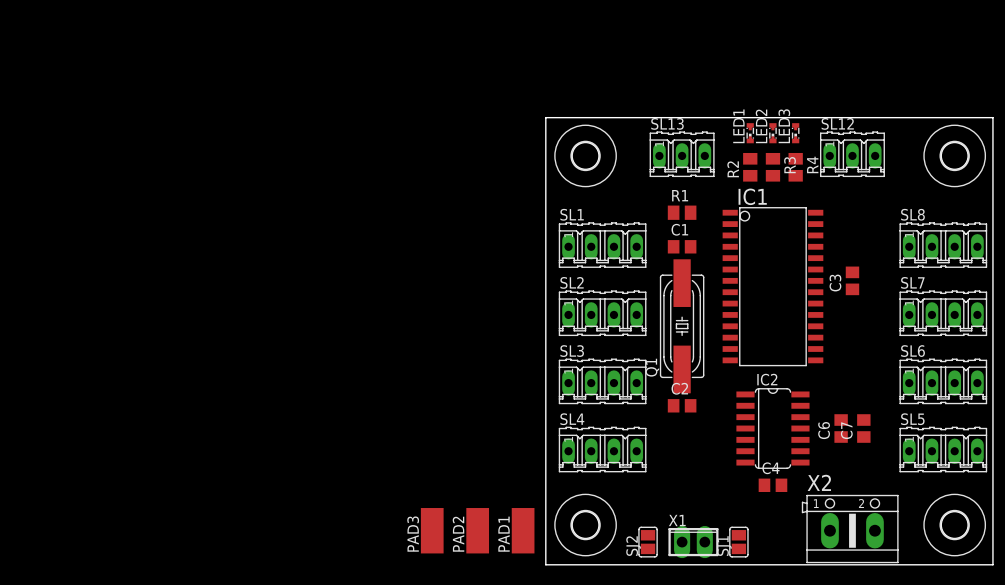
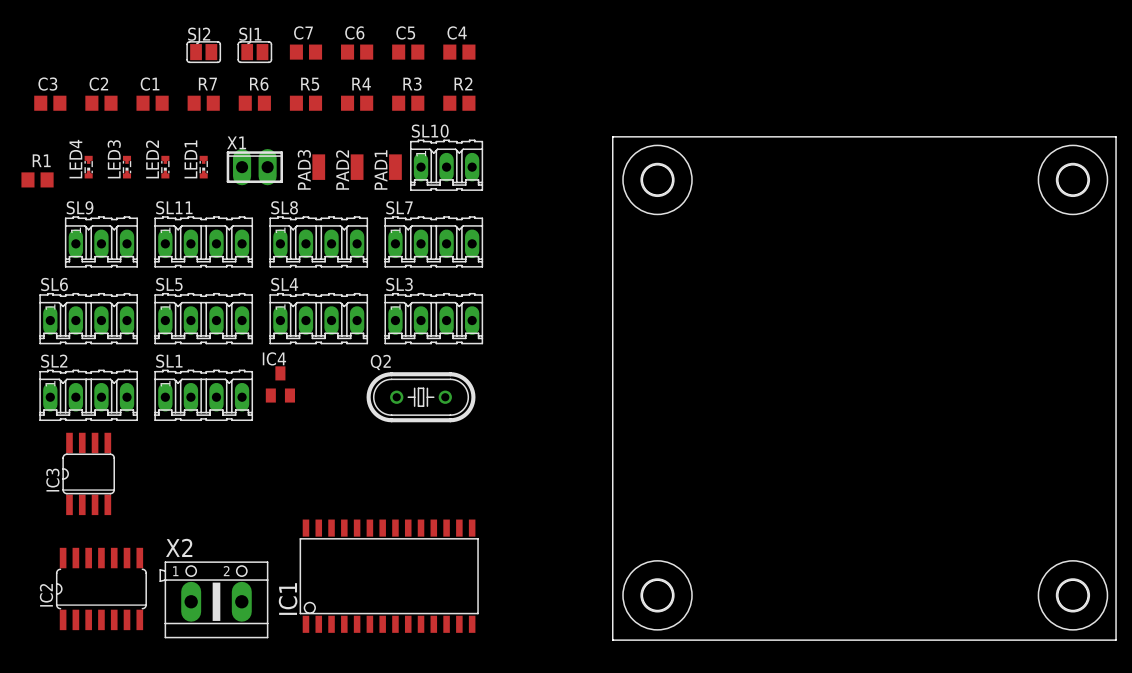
C5: none -> (408, 52)
R7: none -> (203, 103)
R6: none -> (254, 103)
R5: none -> (305, 103)
LED1 position: (750, 133) -> (203, 167)
LED2 position: (772, 133) -> (165, 167)
LED3 position: (795, 133) -> (127, 167)
SL10: none -> (446, 165)
LED4: none -> (88, 167)
R2 footprint: [743, 152, 758, 182] -> [443, 95, 476, 111]
R3 footprint: [765, 152, 781, 182] -> [392, 95, 425, 111]
R4 footprint: [788, 152, 803, 182] -> [341, 95, 374, 111]
SL13: (682, 154) -> none
SL12: (852, 154) -> none
R4 name position: R4 (812, 164) -> R4 (361, 84)
R3 name position: R3 (790, 165) -> R3 (412, 84)
R2 name position: R2 (733, 169) -> R2 (463, 83)
R1 footprint: [667, 205, 697, 220] -> [21, 172, 54, 188]
SL9: none -> (101, 241)
SL11: none -> (203, 241)
SL1 position: (602, 245) -> (203, 395)
SL8 position: (943, 245) -> (318, 241)
C1 position: (682, 246) -> (152, 103)
C3 rotation: 0° (852, 280) -> 90° clockwise (50, 103)
C3 position: (852, 280) -> (50, 103)
IC1 rotation: 0° (772, 286) -> 90° counterclockwise (389, 576)
IC1 position: (772, 286) -> (389, 576)
SL2 position: (602, 313) -> (88, 395)
SL7 position: (943, 313) -> (433, 241)
Q1: (682, 326) -> none
IC4: none -> (280, 384)
Q2: none -> (421, 397)
SL3 position: (602, 381) -> (433, 318)
SL6 position: (943, 381) -> (88, 318)
C2 position: (682, 405) -> (101, 103)
IC3: none -> (88, 473)
IC2 rotation: 0° (772, 428) -> 90° counterclockwise (101, 588)
IC2 position: (772, 428) -> (101, 588)
C6 rotation: 0° (841, 428) -> 90° clockwise (357, 52)
C6 position: (841, 428) -> (357, 52)
C7 rotation: 0° (863, 428) -> 90° clockwise (305, 52)
C7 position: (863, 428) -> (305, 52)
SL4 position: (602, 449) -> (318, 318)
SL5 position: (943, 449) -> (203, 318)
C4 position: (772, 485) -> (459, 52)
PAD3 footprint: [420, 508, 444, 554] -> [312, 154, 326, 180]
PAD2 footprint: [466, 508, 490, 554] -> [350, 154, 364, 180]
PAD1 footprint: [511, 508, 535, 554] -> [389, 154, 402, 180]
X2 position: (850, 529) -> (213, 599)
SJ2 rotation: 0° (648, 542) -> 90° clockwise (203, 52)
SJ2 position: (648, 542) -> (203, 52)
X1 position: (693, 542) -> (254, 167)
SJ1 rotation: 0° (738, 542) -> 90° clockwise (254, 52)
SJ1 position: (738, 542) -> (254, 52)

